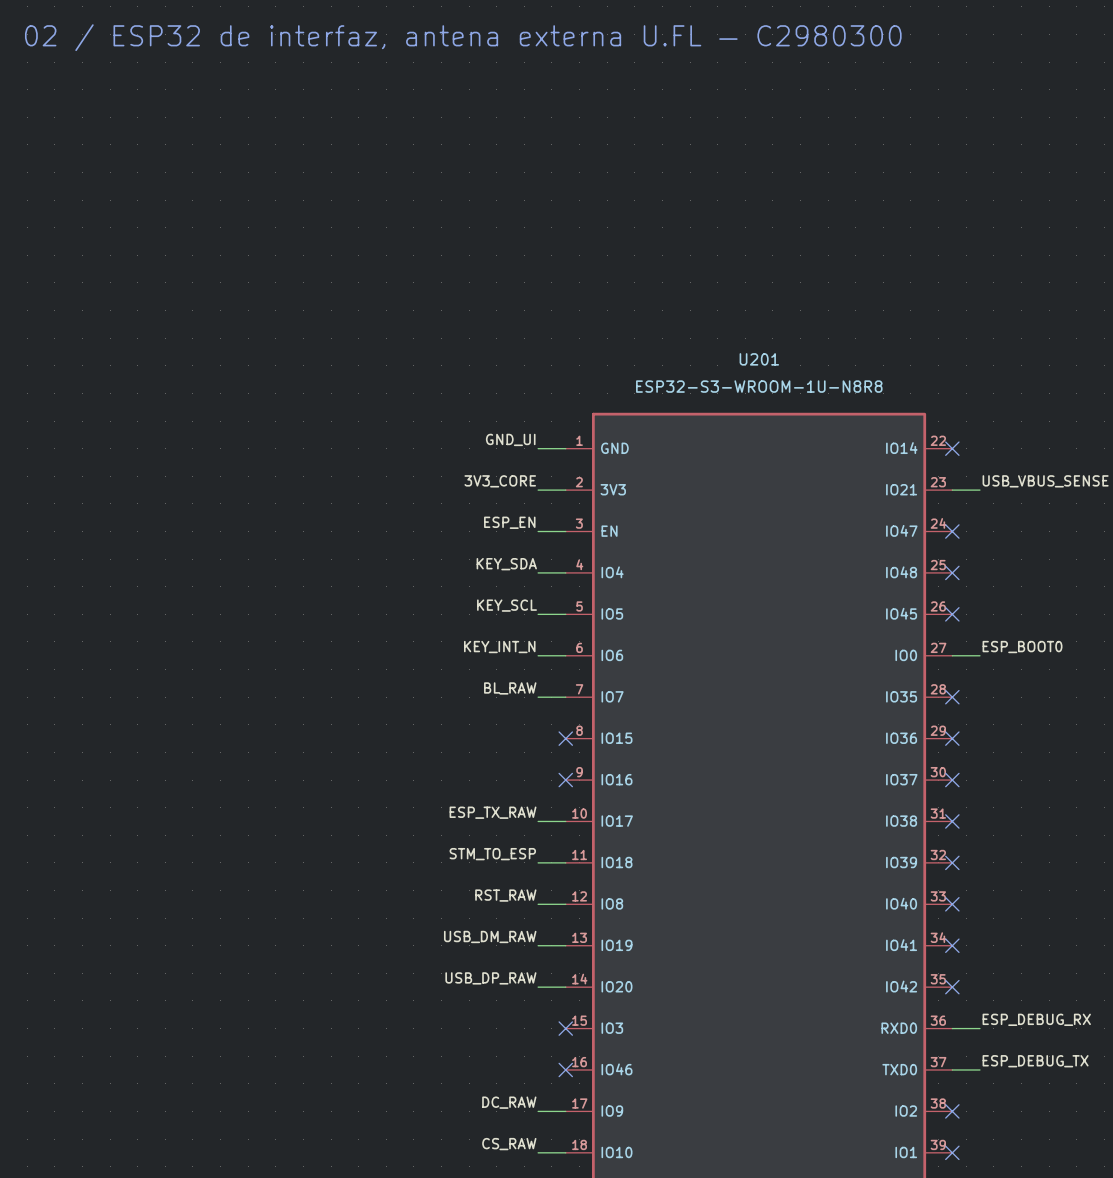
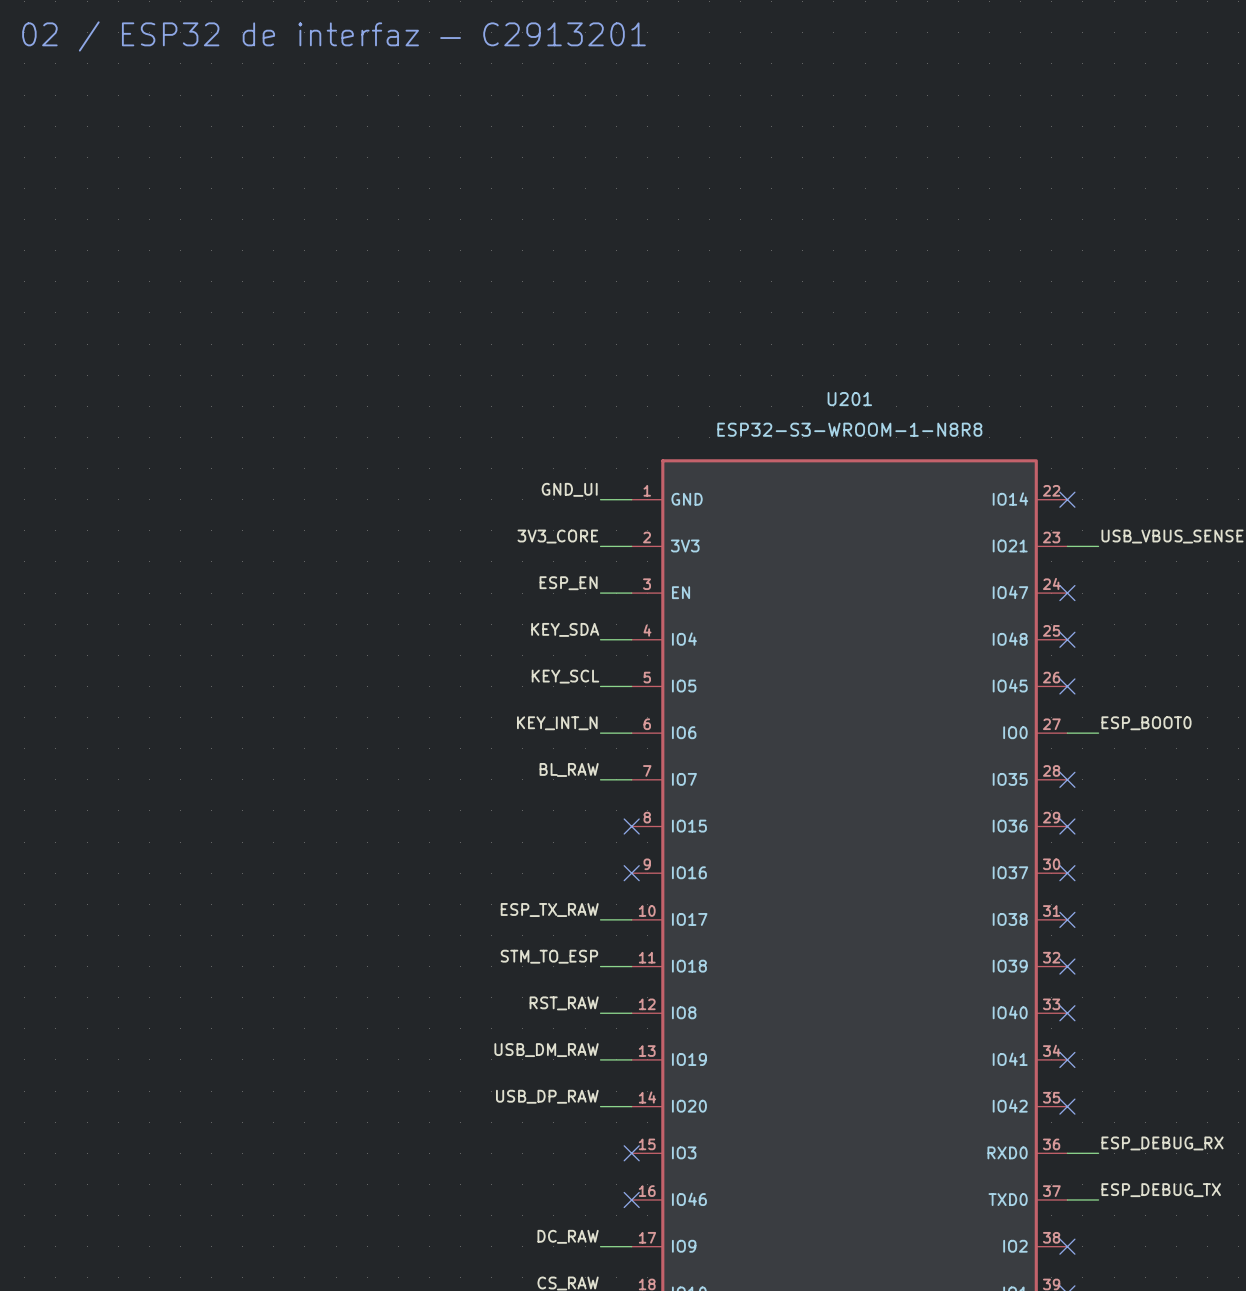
text: 02 / ESP32 de interfaz, antena externa U.FL — C2980300 (463, 37) -> 02 / ESP32 de interfaz — C2913201 (333, 36)
U201 value: ESP32-S3-WROOM-1U-N8R8 (759, 386) -> ESP32-S3-WROOM-1-N8R8 (849, 429)

